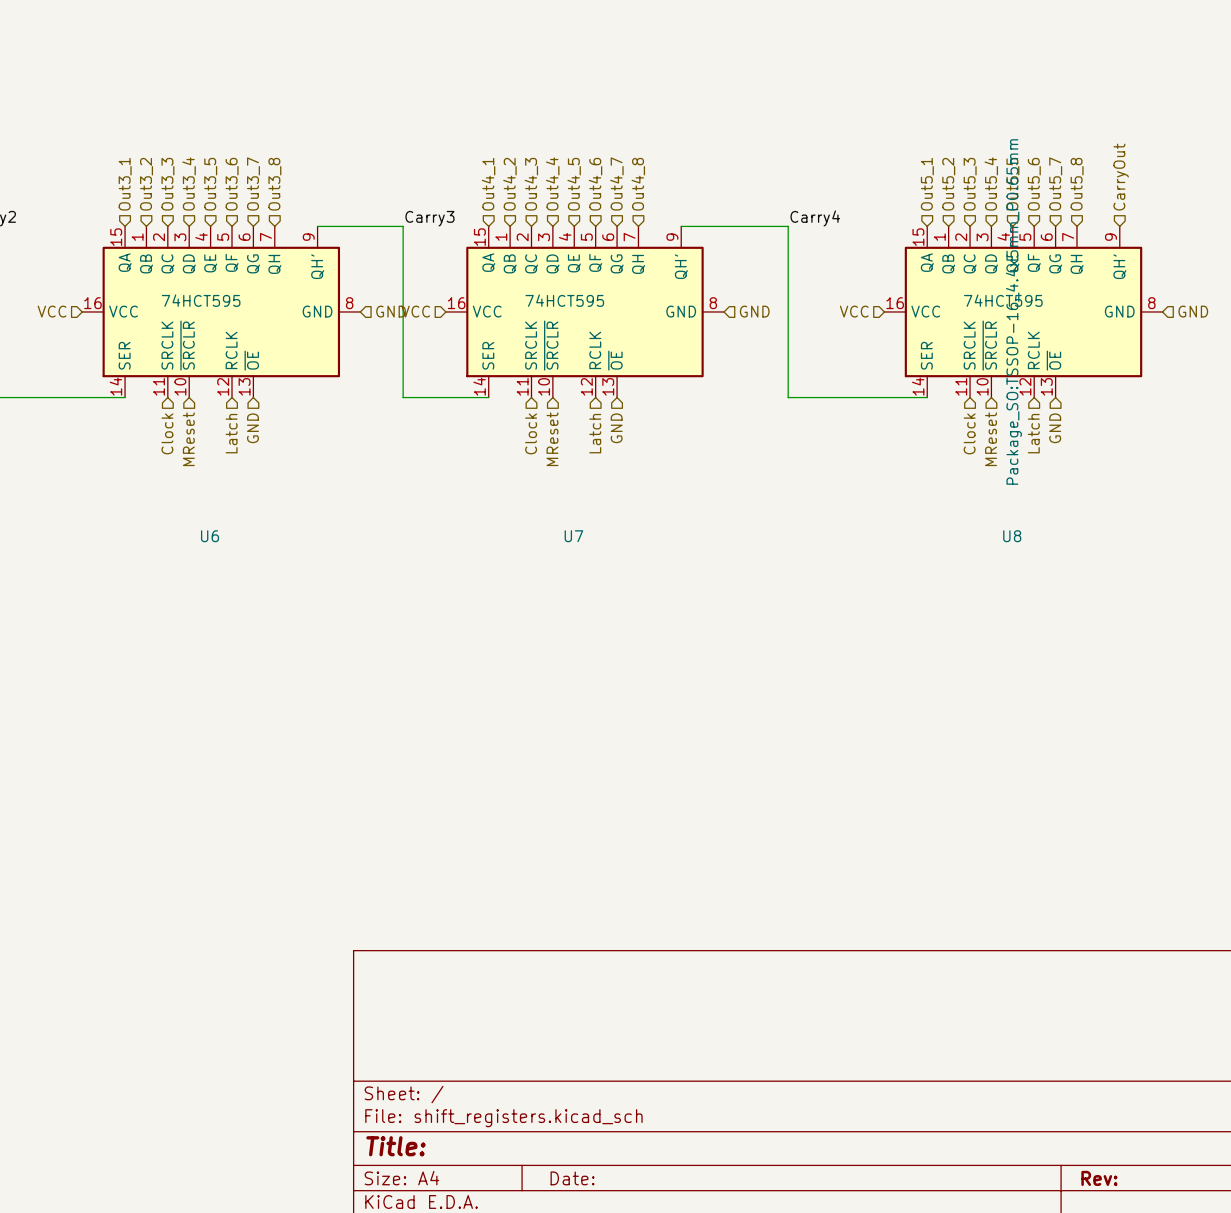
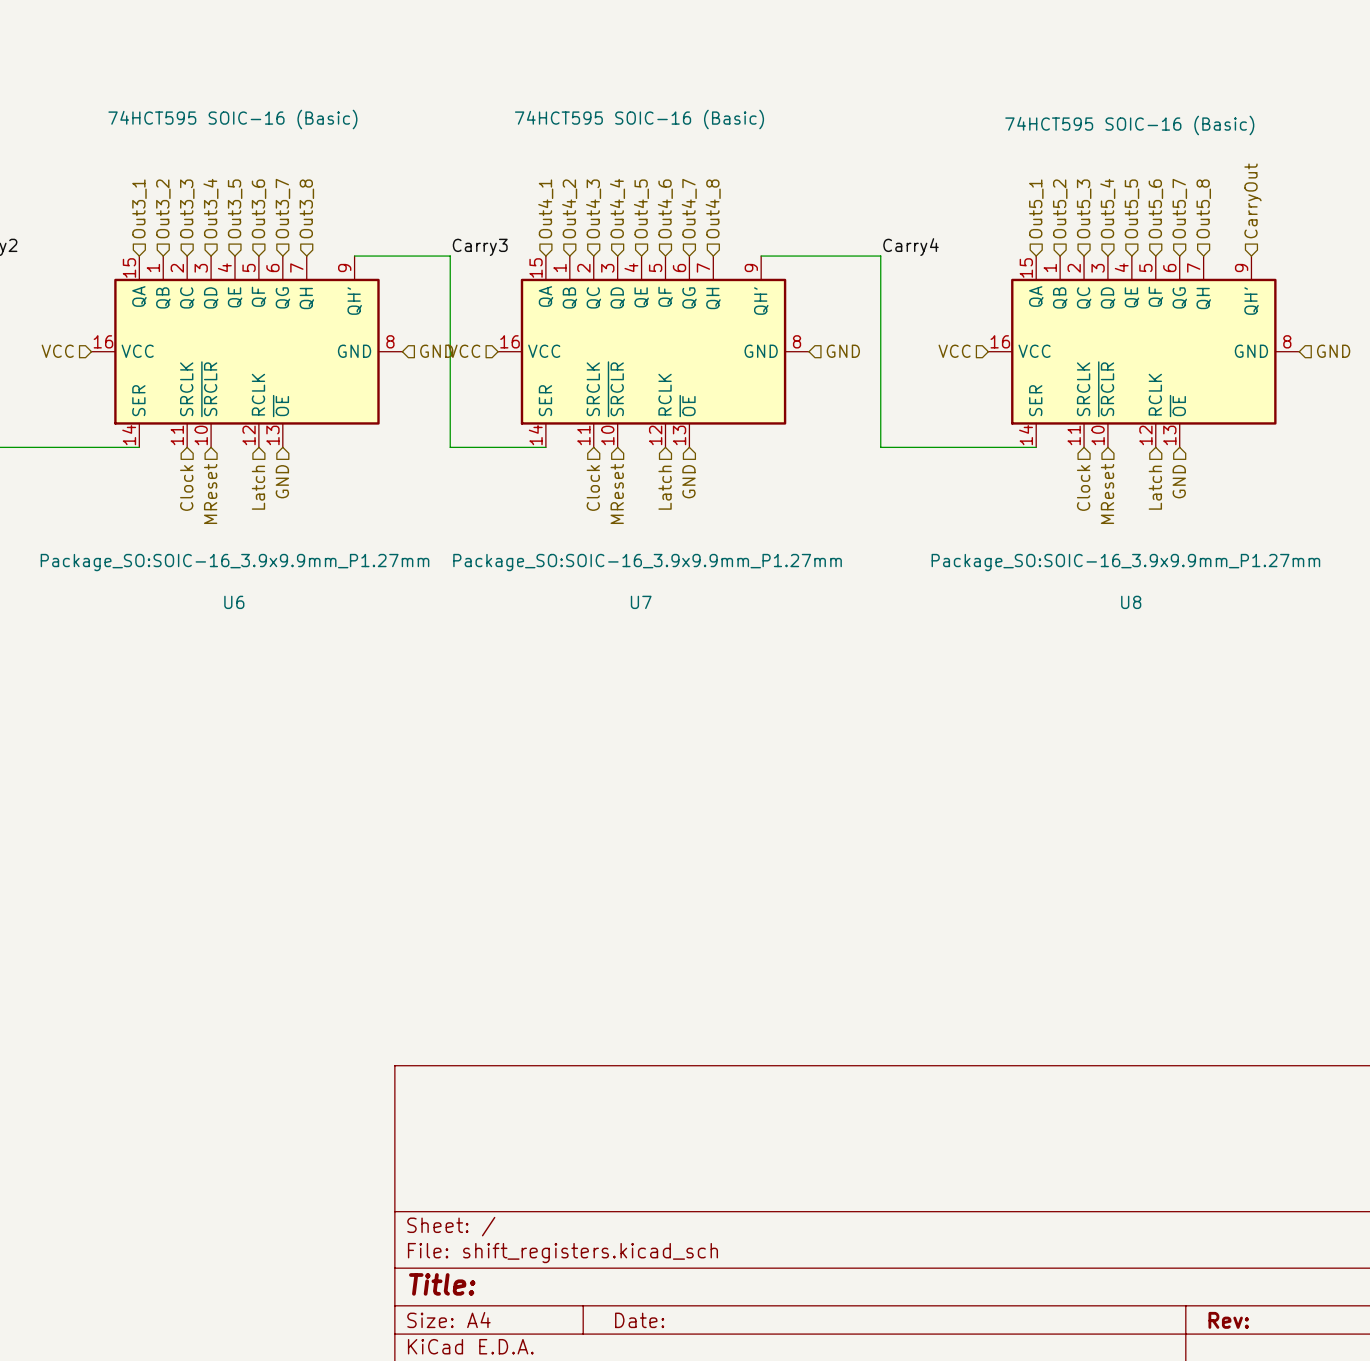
U6 value: 74HCT595 (201, 300) -> 74HCT595 SOIC-16 (Basic) (232, 119)
U7 value: 74HCT595 (564, 300) -> 74HCT595 SOIC-16 (Basic) (639, 119)
U8 value: 74HCT595 (1003, 300) -> 74HCT595 SOIC-16 (Basic) (1129, 125)
U8 text: Package_SO:TSSOP-16_4.4x5mm_P0.65mm (1013, 311) -> Package_SO:SOIC-16_3.9x9.9mm_P1.27mm (1125, 562)
U6 text: none -> Package_SO:SOIC-16_3.9x9.9mm_P1.27mm (234, 562)
U7 text: none -> Package_SO:SOIC-16_3.9x9.9mm_P1.27mm (647, 562)

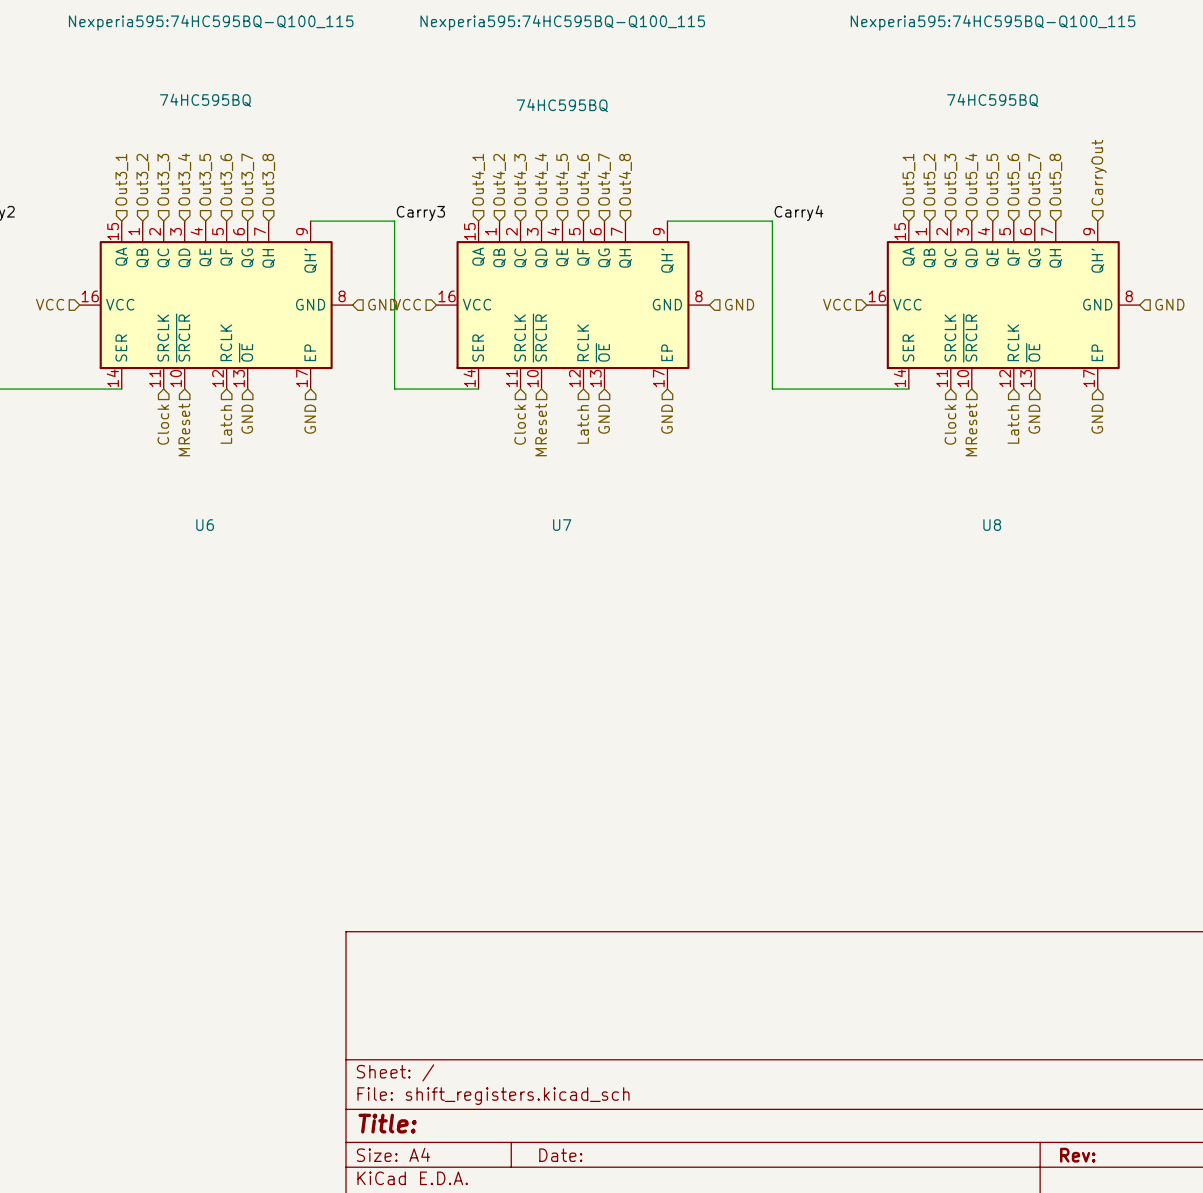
U6 value: 74HCT595 SOIC-16 (Basic) (232, 119) -> 74HC595BQ (205, 100)
U7 value: 74HCT595 SOIC-16 (Basic) (639, 119) -> 74HC595BQ (562, 105)
U8 value: 74HCT595 SOIC-16 (Basic) (1129, 125) -> 74HC595BQ (992, 100)
U6 symbol: [91, 256, 403, 448] -> [79, 221, 353, 390]
U7 symbol: [498, 256, 809, 448] -> [436, 221, 710, 390]
U8 symbol: [988, 256, 1300, 448] -> [866, 221, 1140, 390]
hierarchical label: none -> GND (310, 419)
hierarchical label: none -> GND (667, 419)
hierarchical label: none -> GND (1097, 419)
U6 text: Package_SO:SOIC-16_3.9x9.9mm_P1.27mm (234, 562) -> Nexperia595:74HC595BQ-Q100_115 (211, 22)
U7 text: Package_SO:SOIC-16_3.9x9.9mm_P1.27mm (647, 562) -> Nexperia595:74HC595BQ-Q100_115 (562, 22)
U8 text: Package_SO:SOIC-16_3.9x9.9mm_P1.27mm (1125, 562) -> Nexperia595:74HC595BQ-Q100_115 (993, 22)

